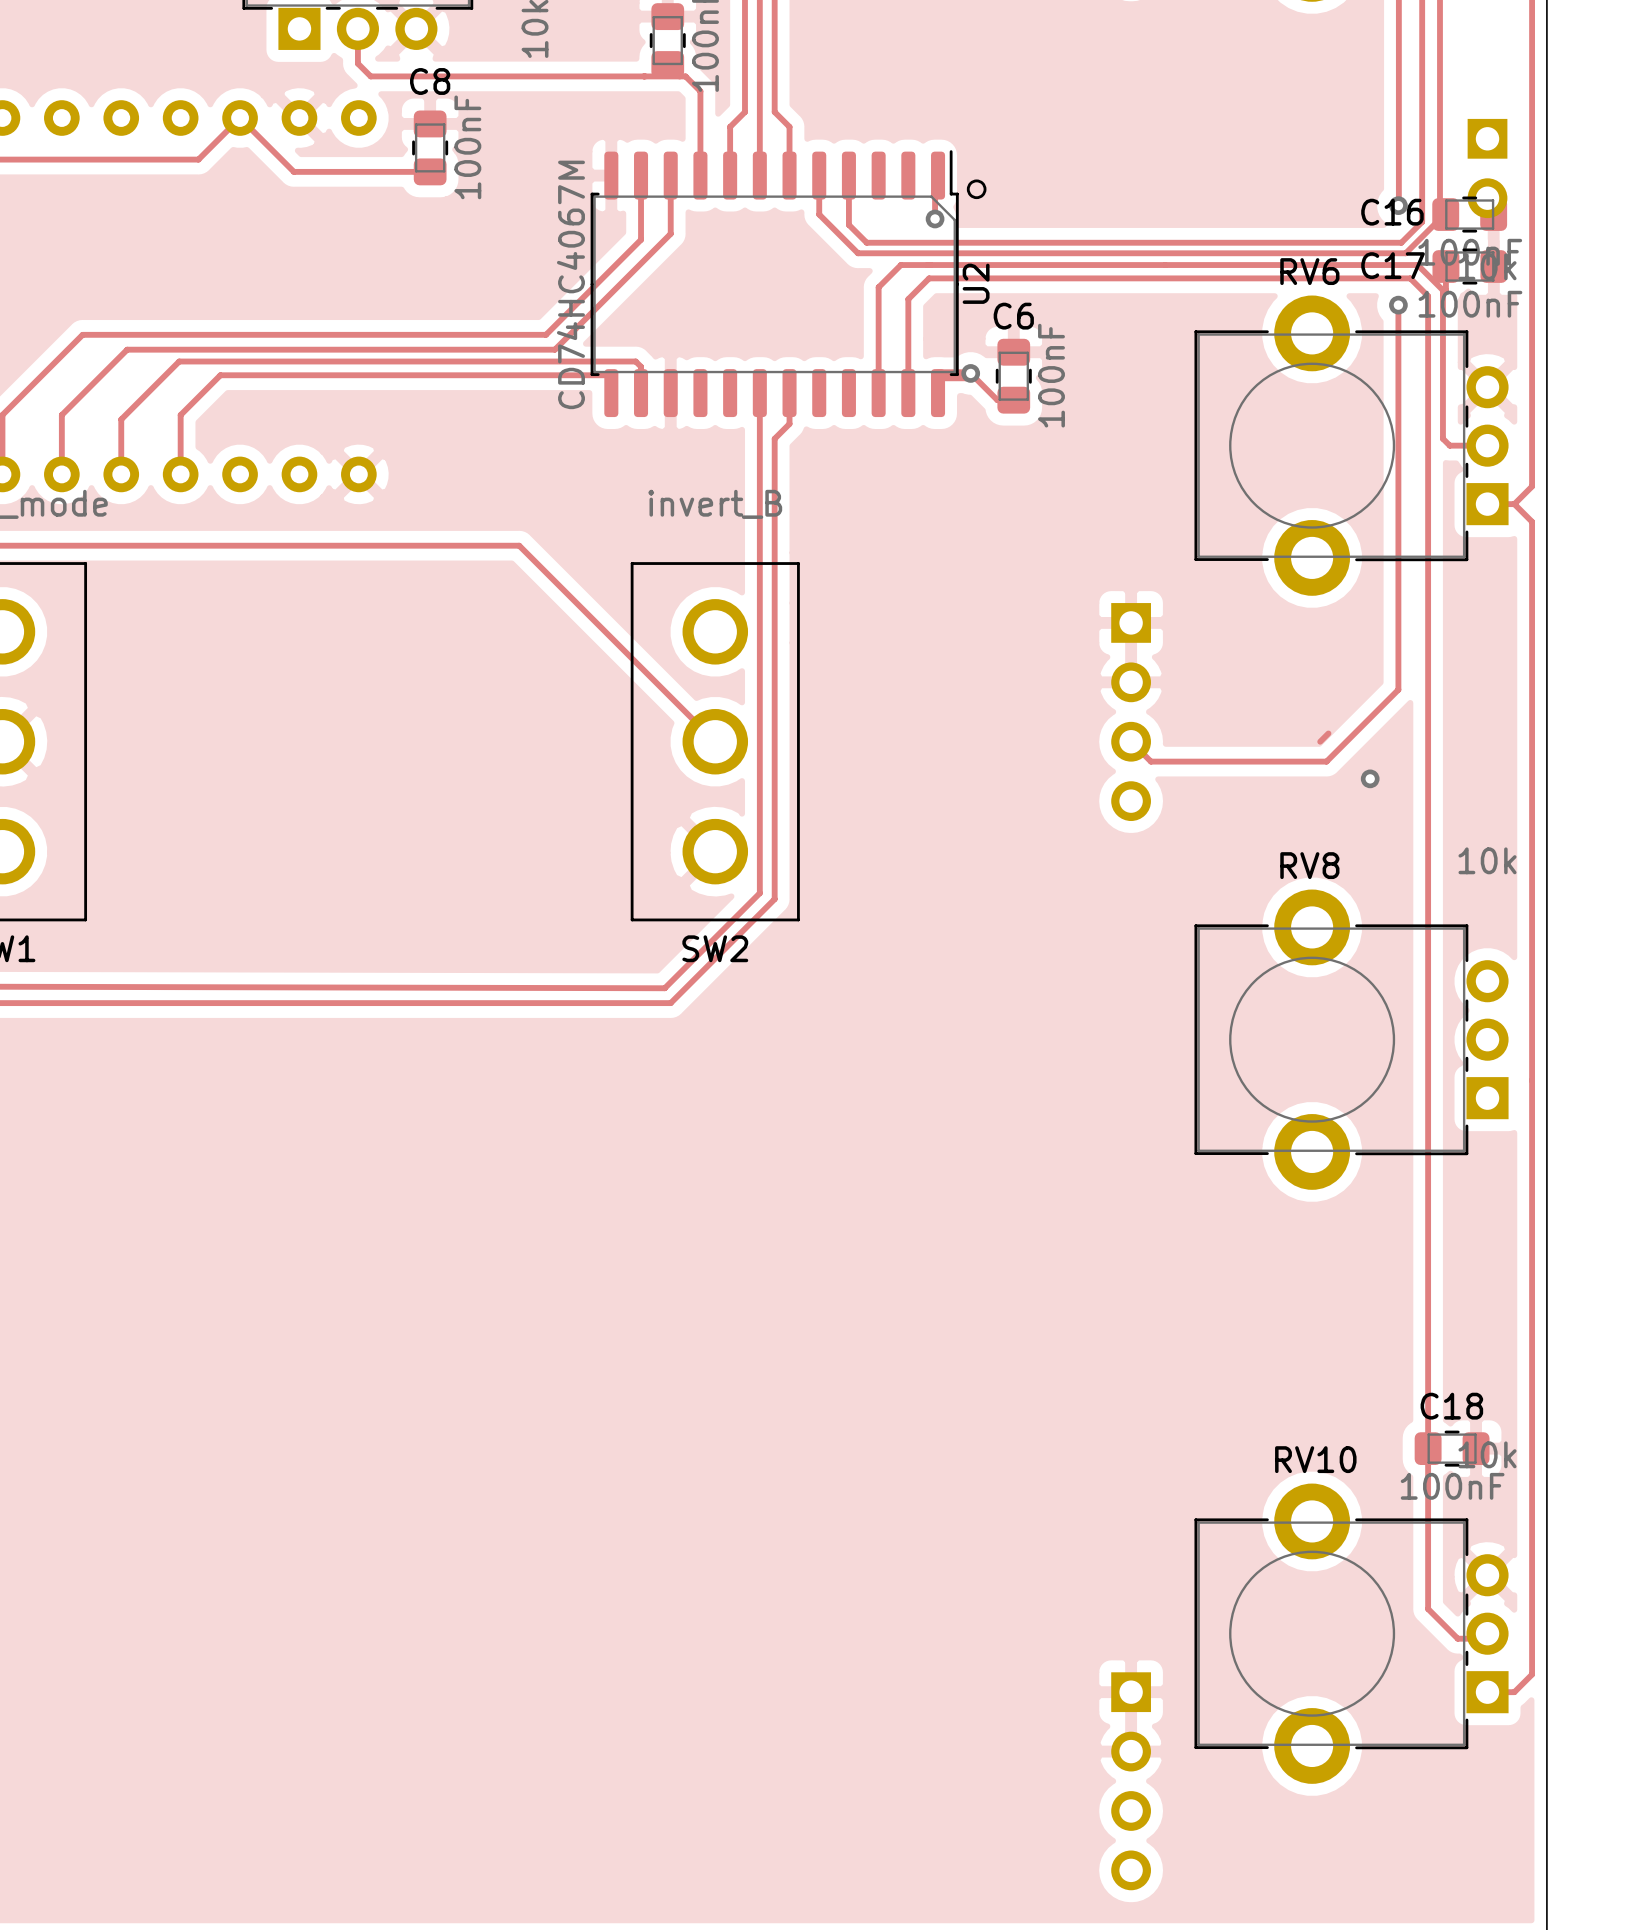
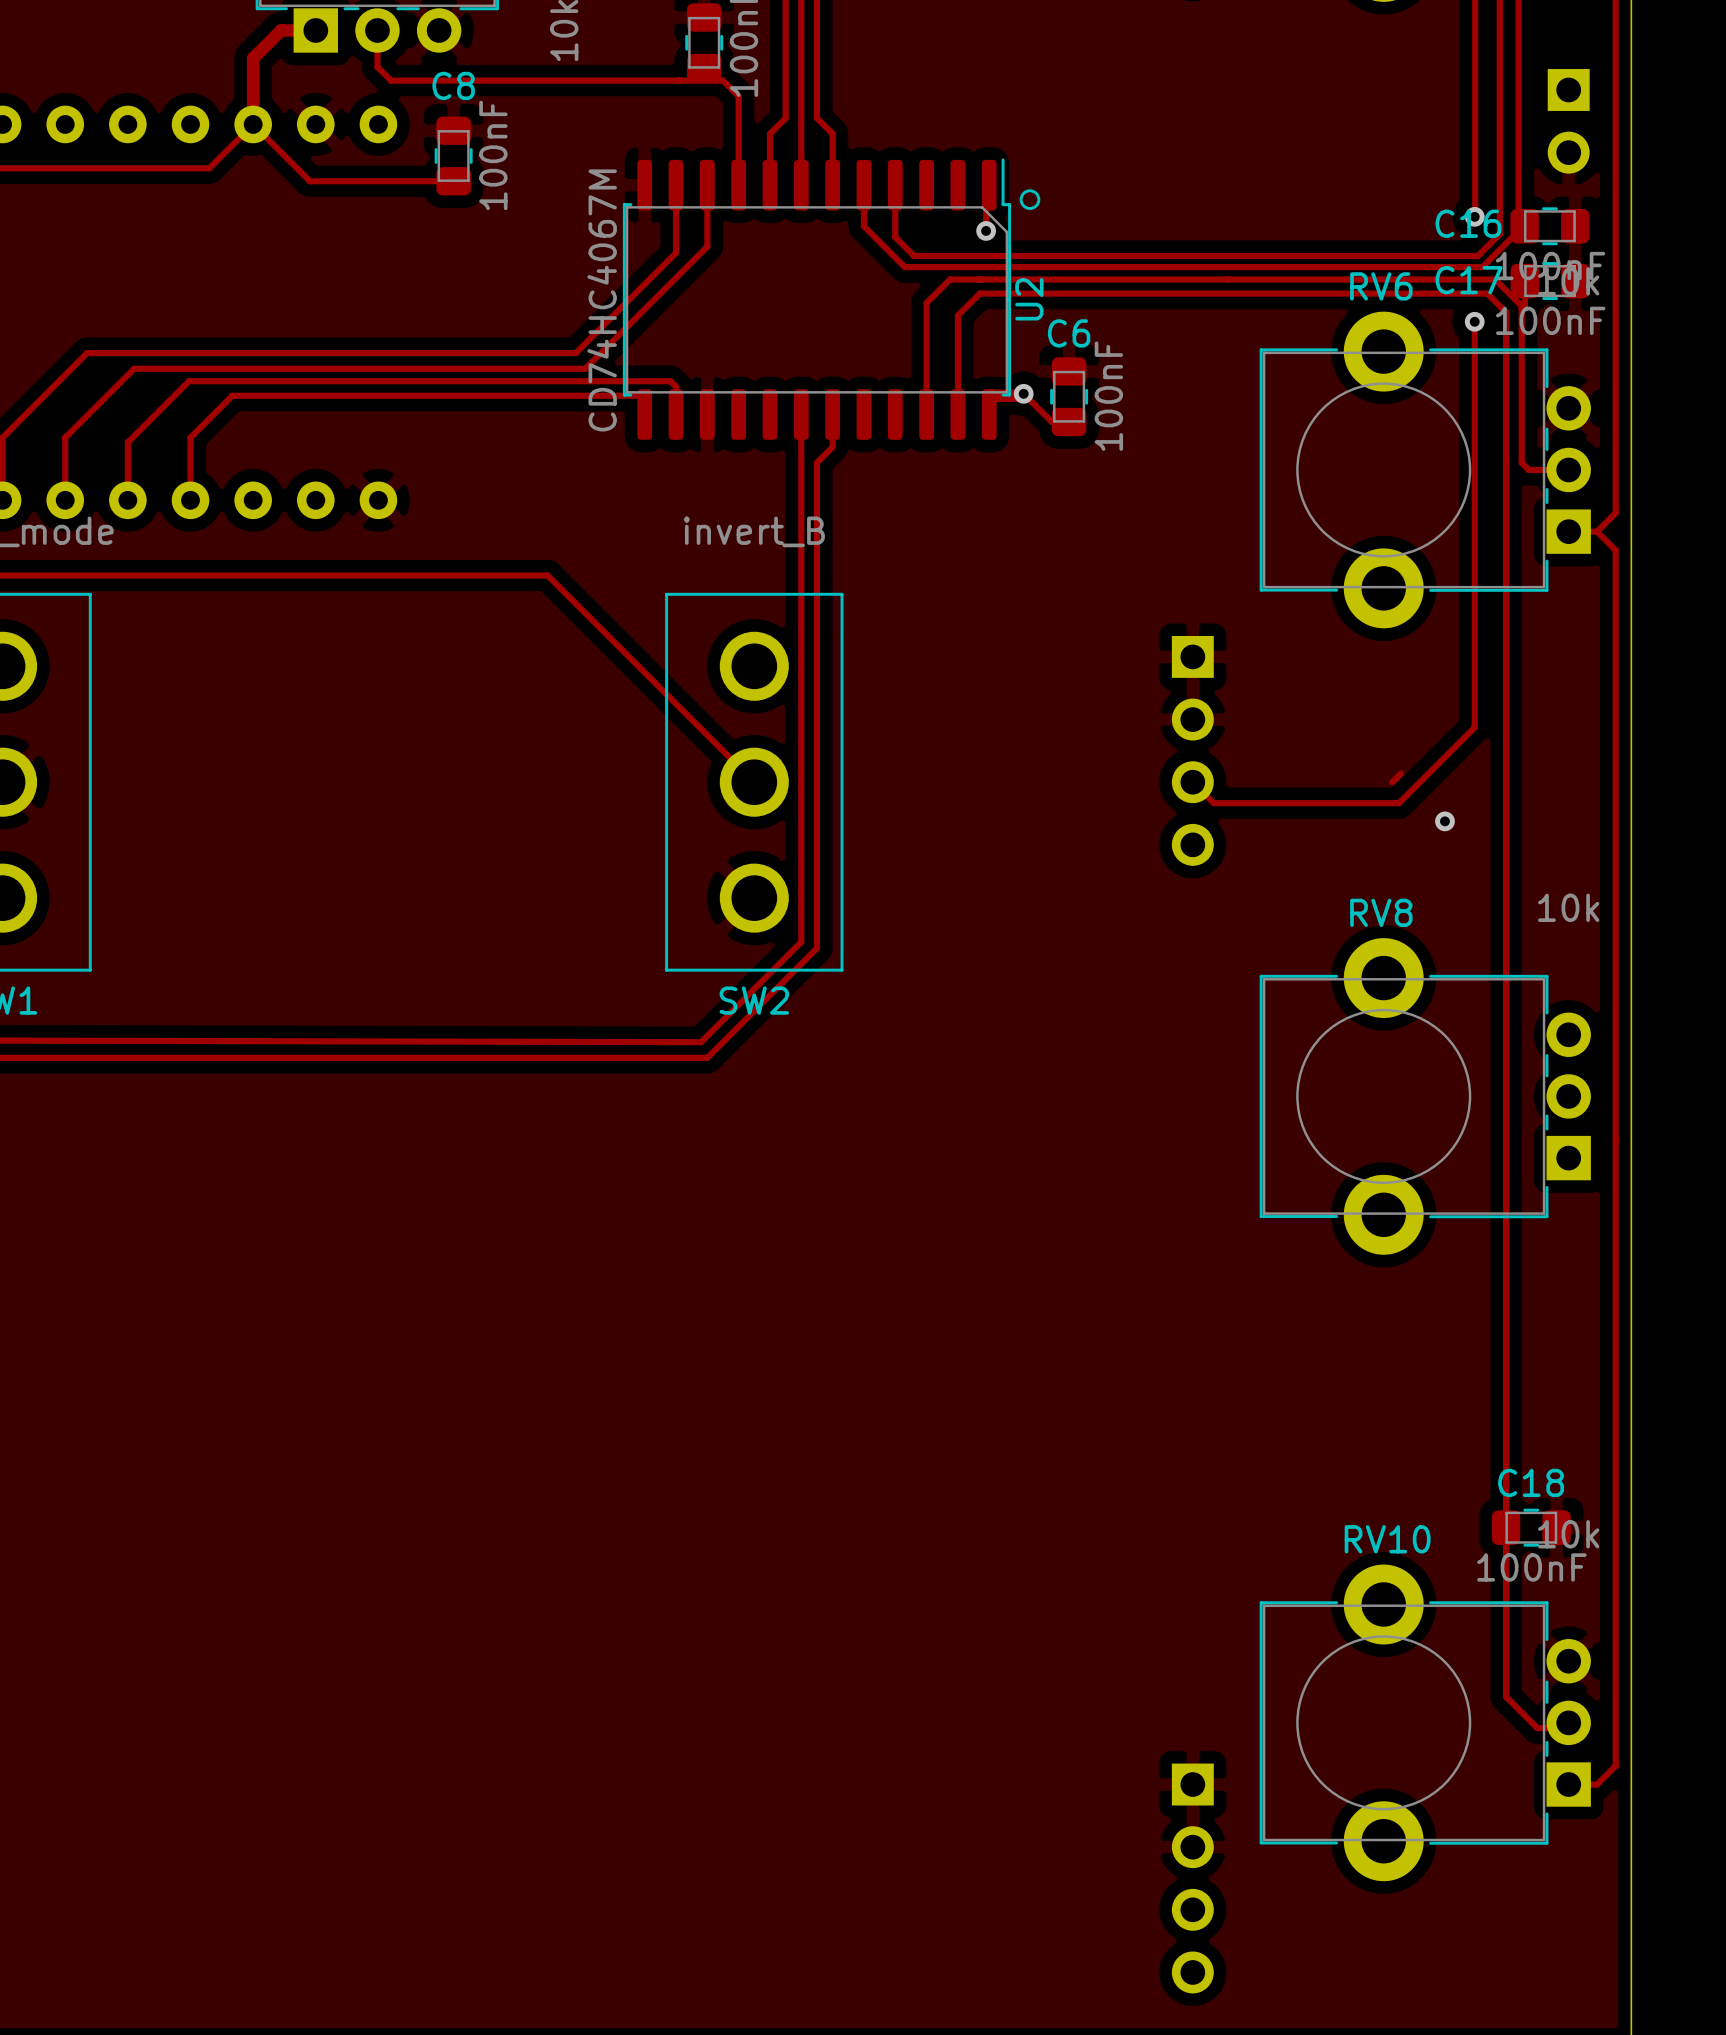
track: none -> (315, 30) (281, 30) (253, 58) (253, 124)
part position: (1487, 168) -> (1568, 121)

